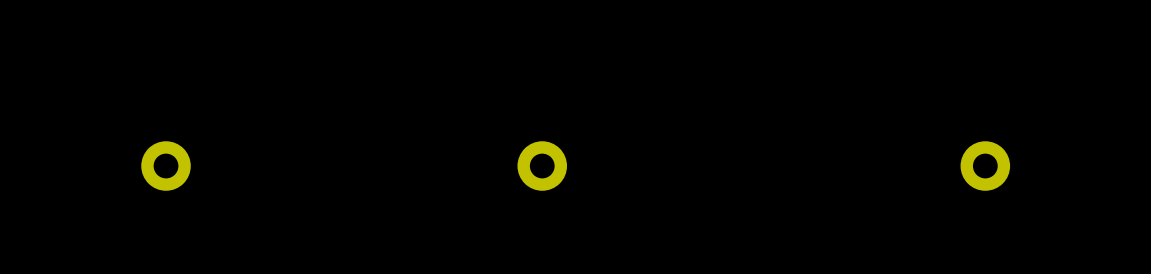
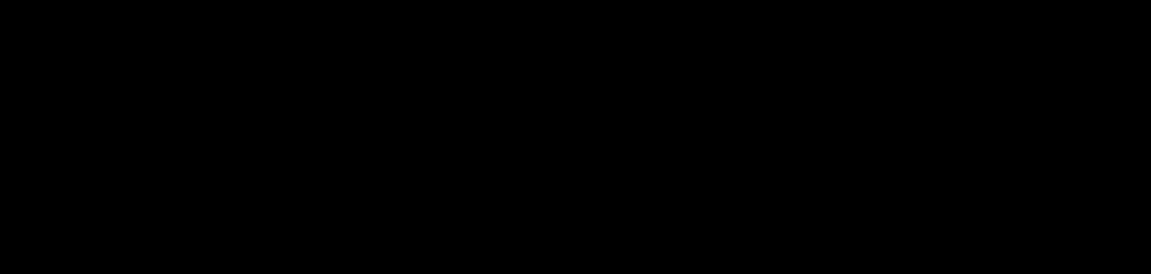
part: (166, 166) -> none
part: (542, 166) -> none
part: (985, 166) -> none

